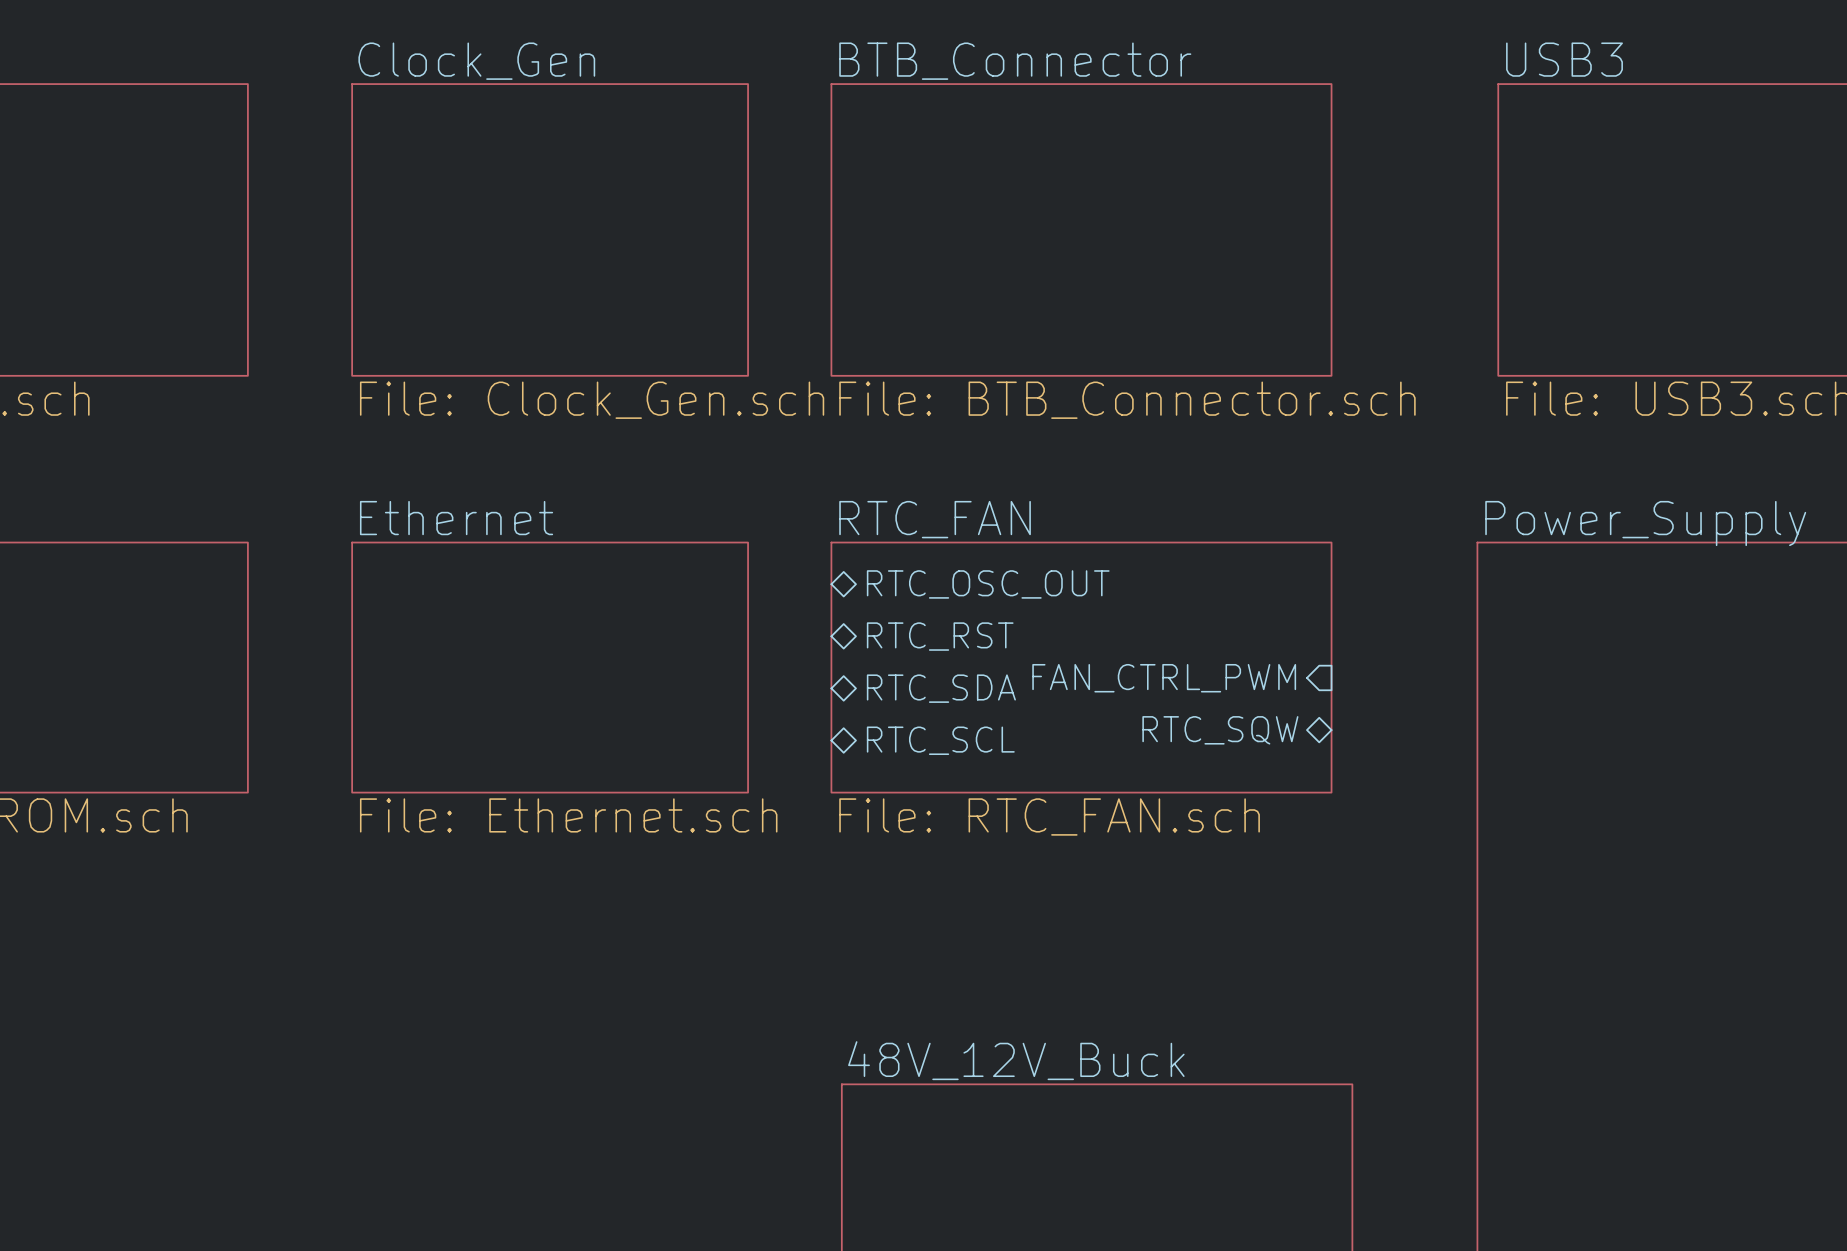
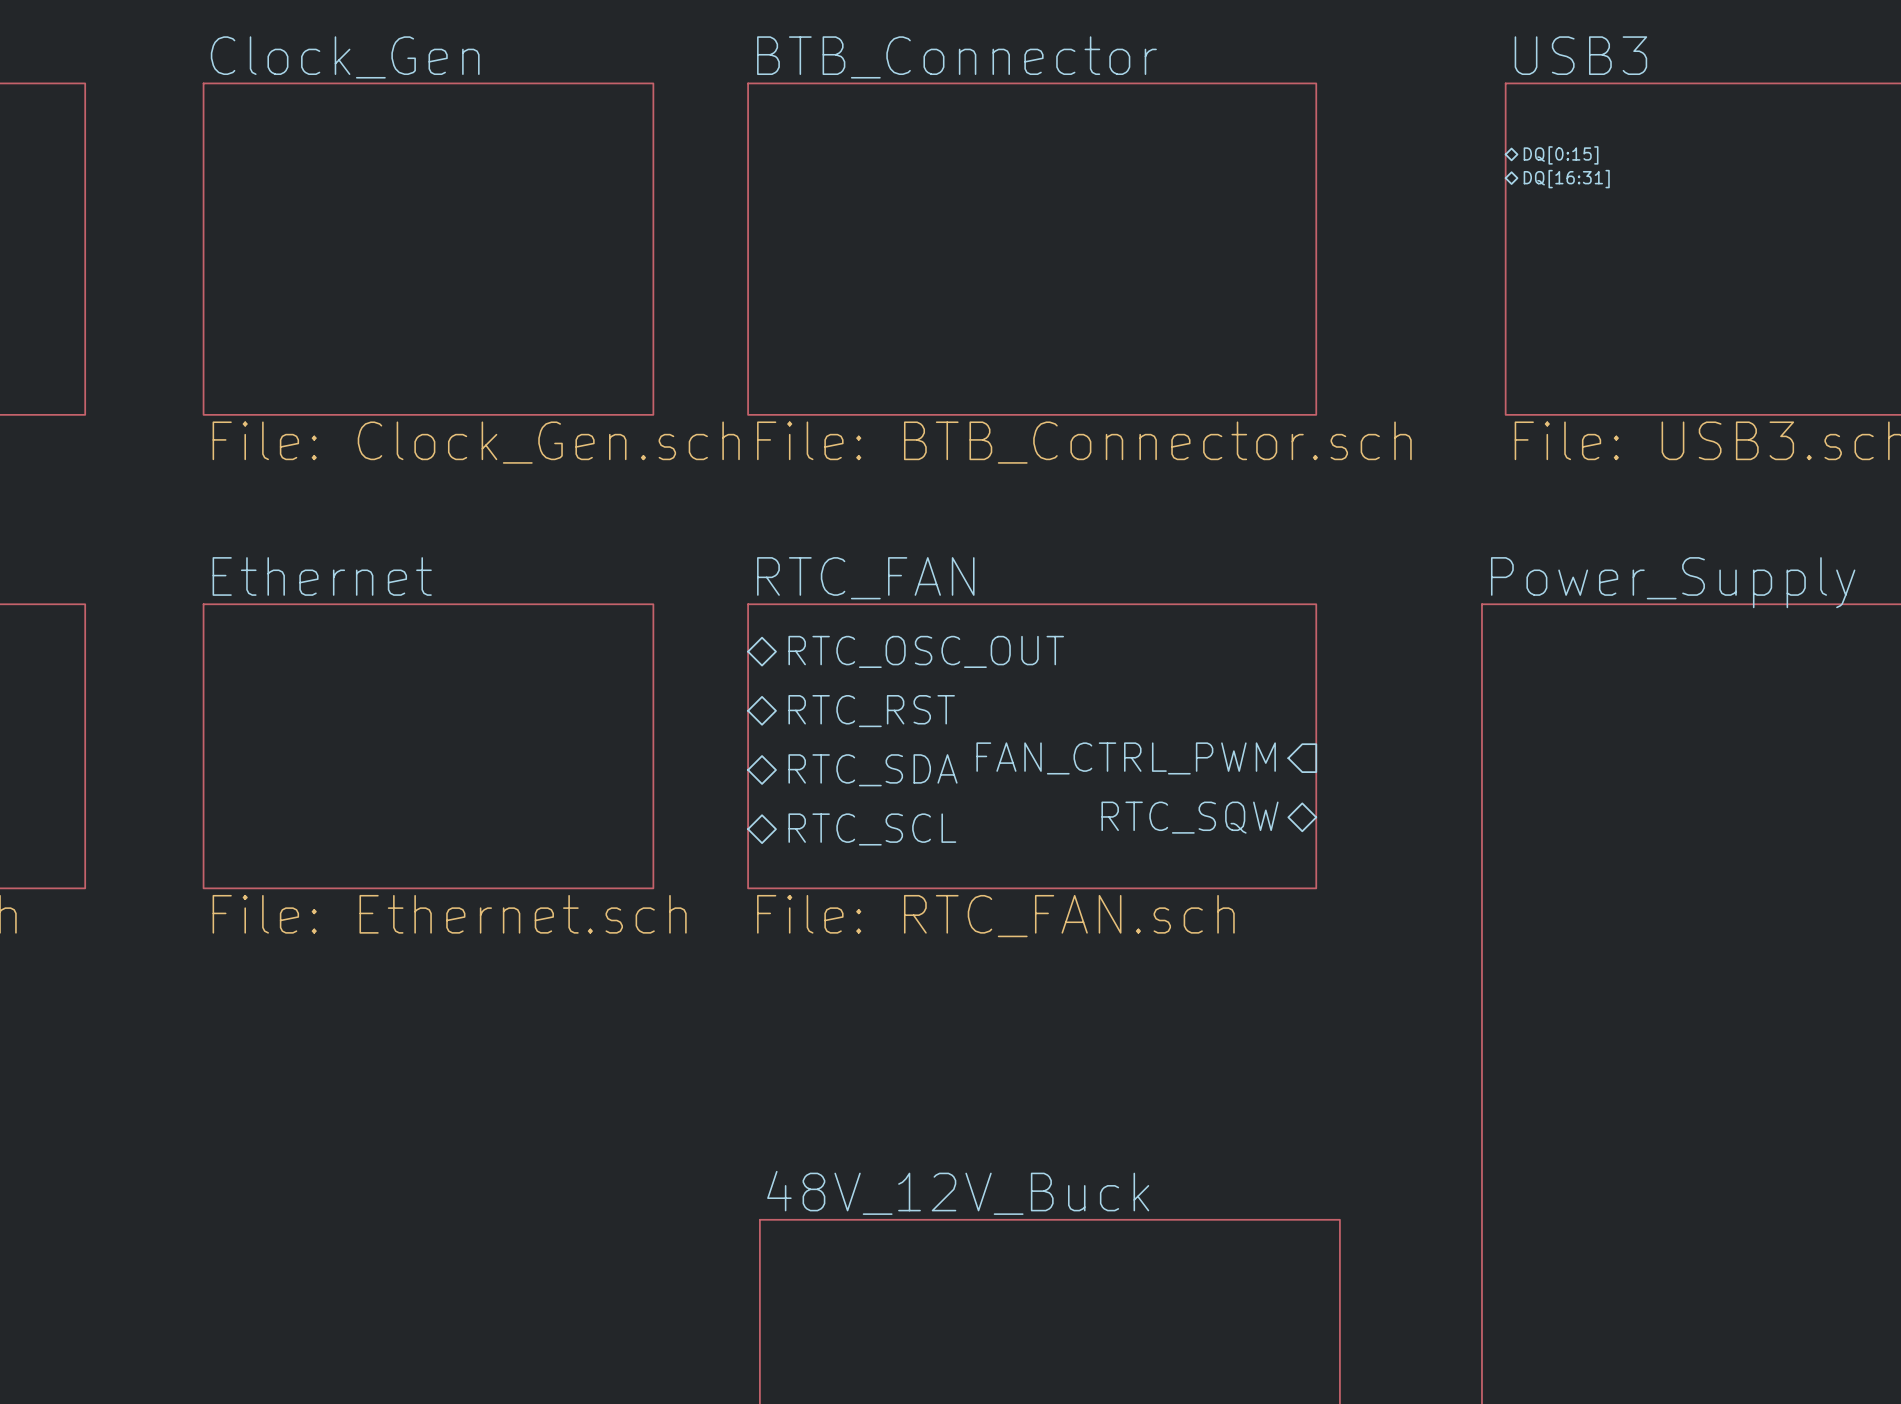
sheet pin: none -> DQ[0:15] (1561, 155)
sheet pin: none -> DQ[16:31] (1566, 179)

